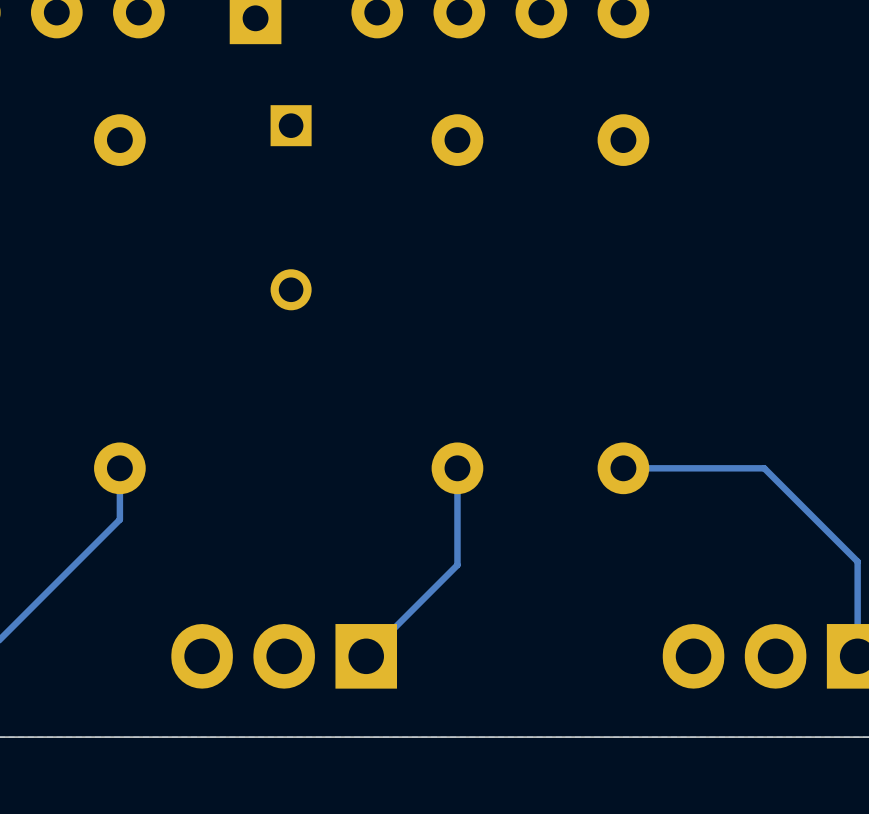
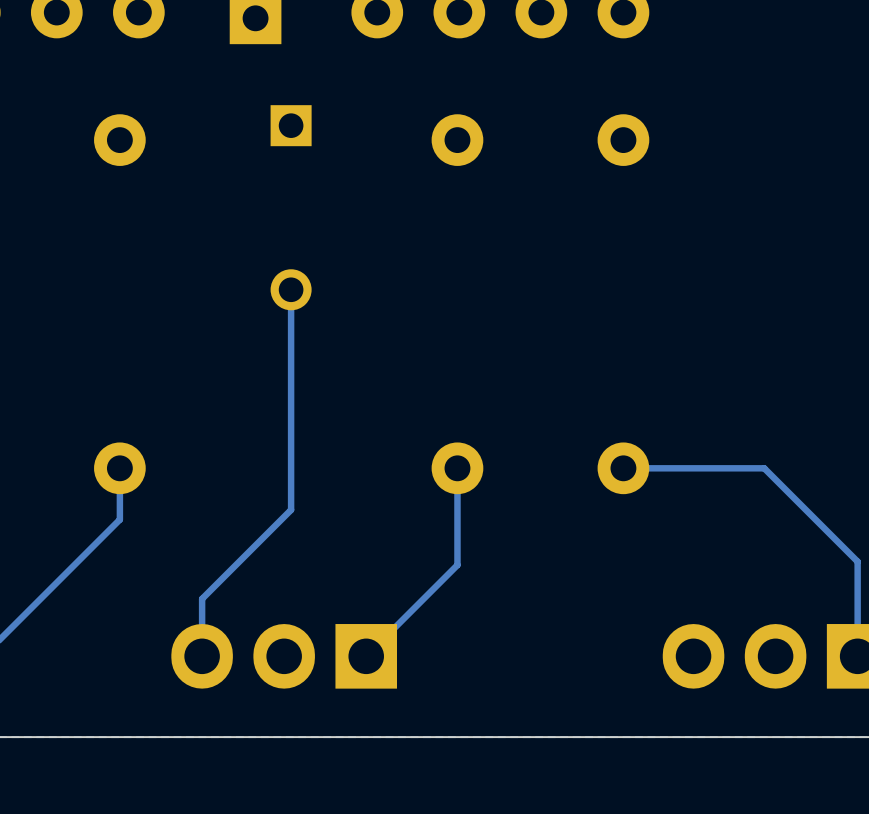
track: none -> (291, 289) (291, 509) (202, 598) (202, 656)

